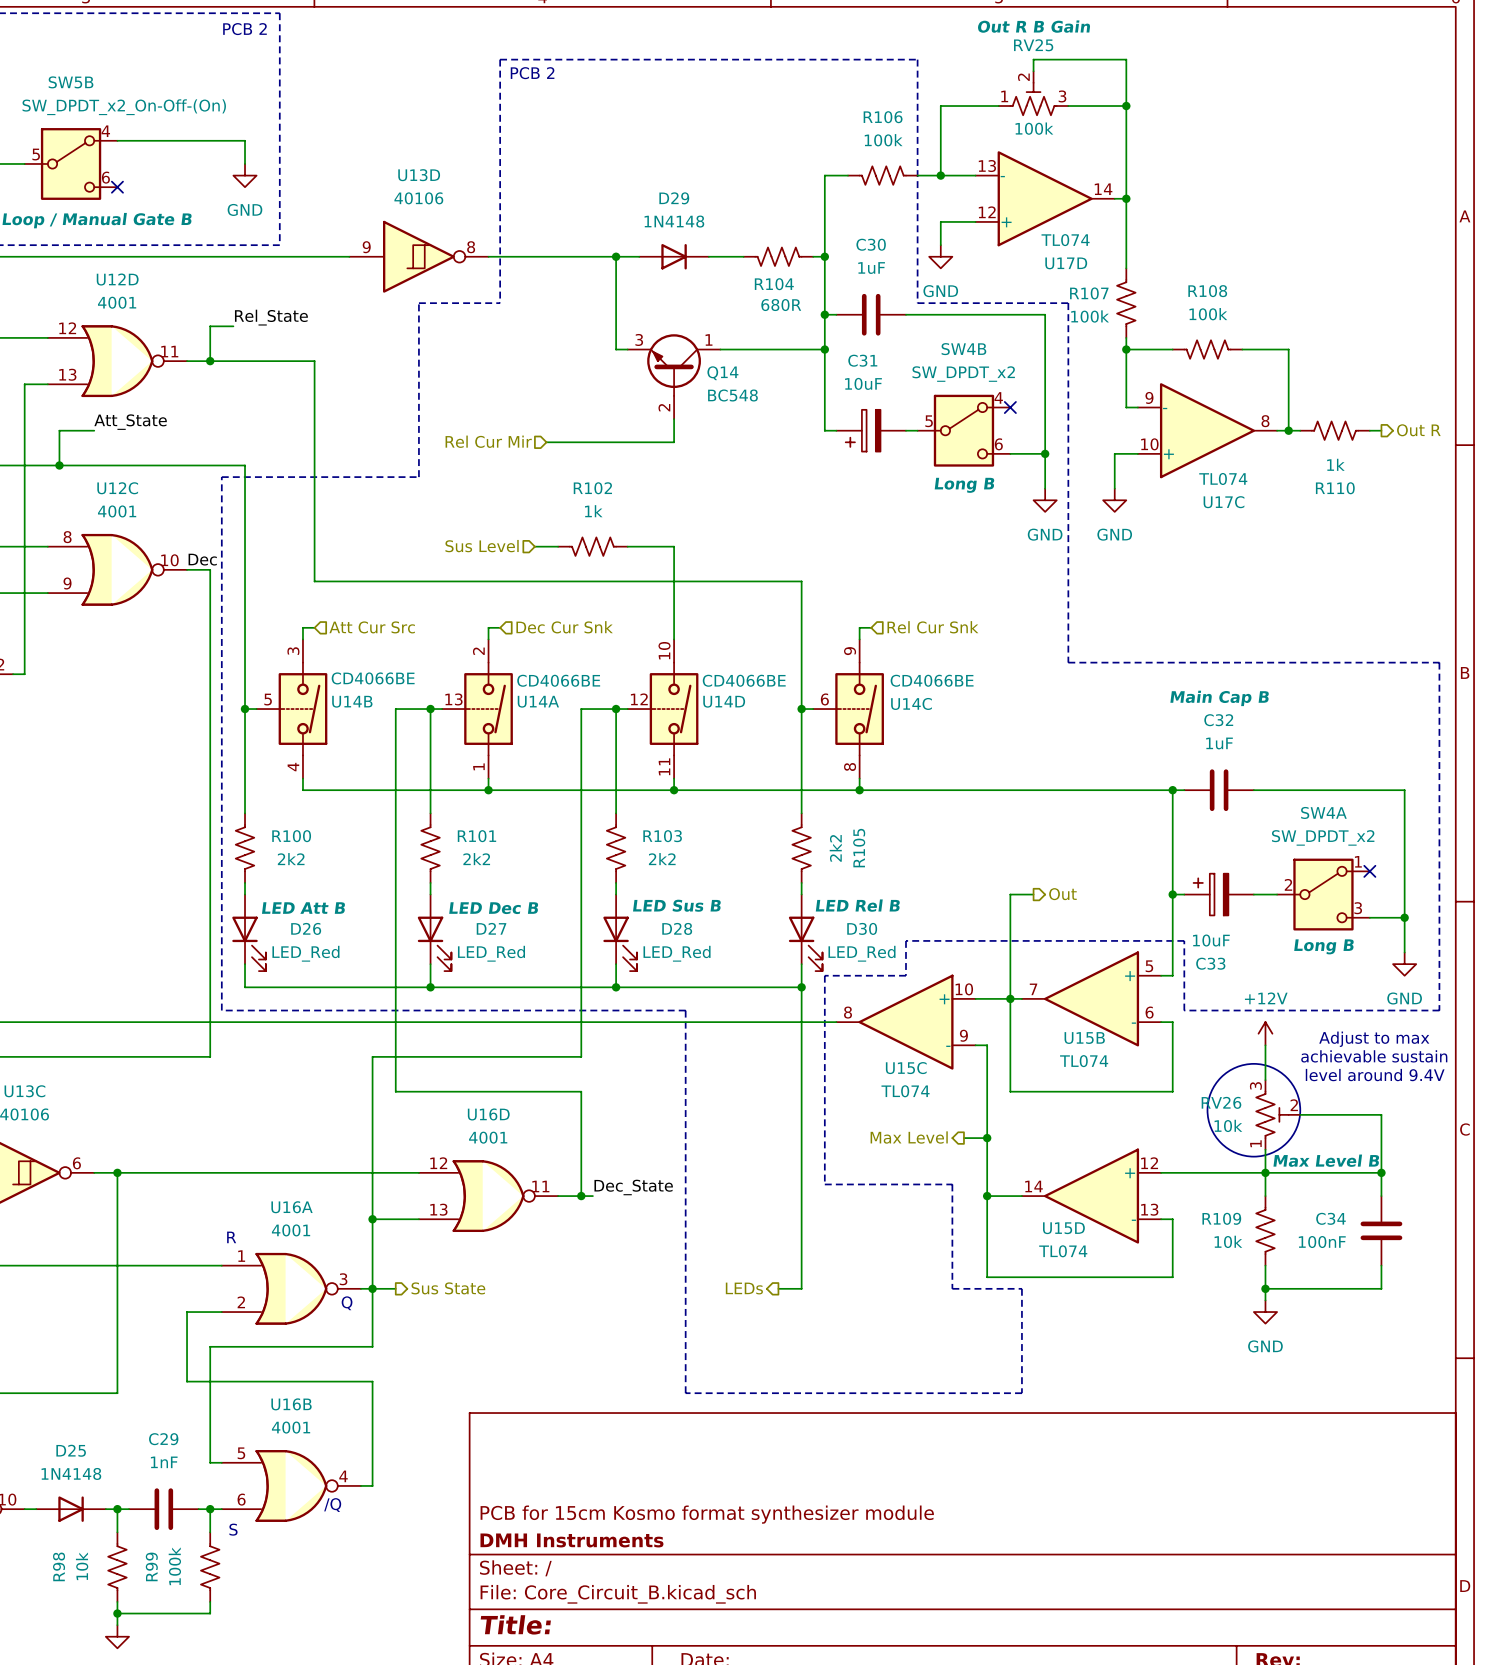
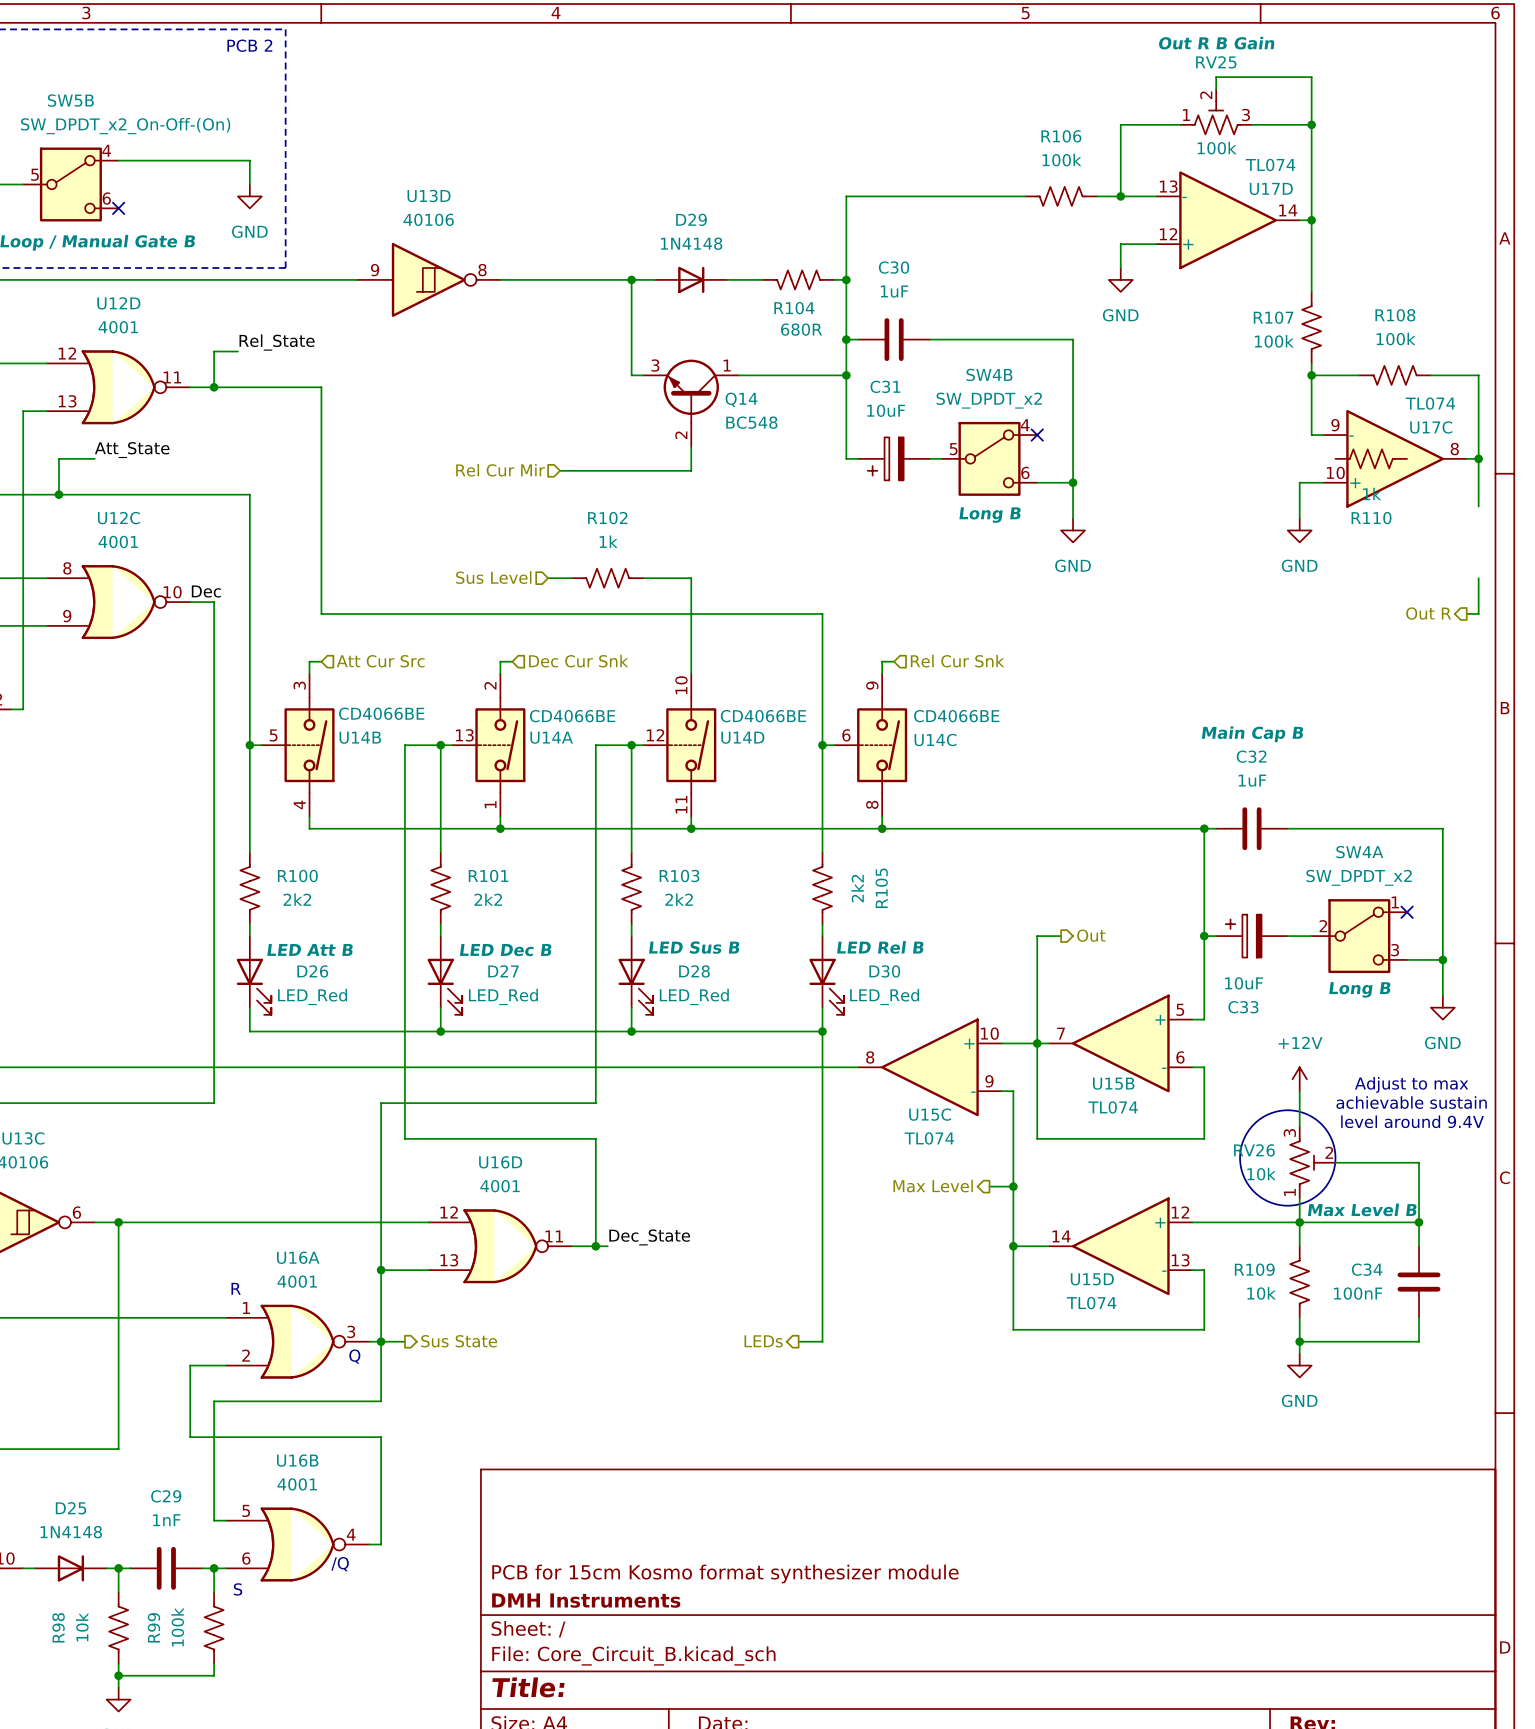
line: (500, 59) (500, 303) (418, 303) (418, 477) (221, 477) (221, 1010) (685, 1010) (685, 1393) (1021, 1393) (1021, 1288) (952, 1288) (952, 1184) (824, 1184) (824, 975) (905, 975) (905, 940) (1184, 940) (1184, 1010) (1439, 1010) (1439, 662) (1068, 662) (1068, 303) (917, 303) (917, 59) (500, 59) -> none
wire: (1033, 71) (1033, 59) (1126, 59) (1126, 268) -> (1216, 89) (1216, 77) (1311, 77) (1311, 291)
text: PCB 2 (532, 73) -> none
RV25 position: (1033, 93) -> (1216, 111)
wire: (998, 106) (940, 106) (940, 175) -> none
wire: (1068, 106) (1091, 106) -> (1120, 196) (1120, 124)
wire: none -> (1156, 124) (1180, 124)
junction: (1126, 106) -> none
wire: none -> (1251, 124) (1311, 124)
junction: none -> (1311, 124)
R106 position: (882, 175) -> (1061, 196)
junction: (940, 175) -> none
wire: none -> (1096, 196) (1156, 196)
junction: none -> (1120, 196)
U17D position: (1045, 198) -> (1228, 220)
wire: (1114, 198) (1126, 198) -> (1299, 220) (1311, 220)
junction: (1126, 198) -> none
junction: none -> (1311, 220)
wire: (975, 221) (940, 221) (940, 245) -> (1156, 244) (1120, 244) (1120, 268)
U17D value position: TL074 (1065, 240) -> TL074 (1270, 164)
power symbol: GND (940, 256) -> none
power symbol: none -> GND (1120, 279)
U17D name position: U17D (1066, 263) -> U17D (1271, 188)
R107 position: (1126, 303) -> (1311, 327)
wire: (1126, 337) (1126, 407) (1137, 407) -> (1311, 363) (1311, 435) (1323, 435)
wire: (1126, 349) (1172, 349) -> none
junction: (1126, 349) -> none
R108 position: (1207, 349) -> (1395, 375)
wire: (1242, 349) (1277, 349) -> none
junction: none -> (1311, 375)
wire: (1288, 349) (1288, 430) -> (1323, 375) (1359, 375)
wire: none -> (1430, 375) (1478, 375) (1478, 506)
U17C position: (1207, 430) -> (1395, 458)
wire: (1277, 430) (1300, 430) -> none
junction: (1288, 430) -> none
hierarchical label rotation: 0° (1418, 430) -> 180° (1428, 613)
hierarchical label position: Out R (1418, 430) -> Out R (1428, 613)
junction: none -> (1478, 458)
wire: (1137, 453) (1114, 453) (1114, 488) -> (1323, 482) (1299, 482) (1299, 518)
U17C value position: TL074 (1223, 478) -> TL074 (1430, 403)
power symbol: GND (1114, 500) -> none
power symbol: none -> GND (1299, 530)
U17C name position: U17C (1223, 502) -> U17C (1431, 427)
wire: none -> (1478, 578) (1478, 613) (1466, 613)

